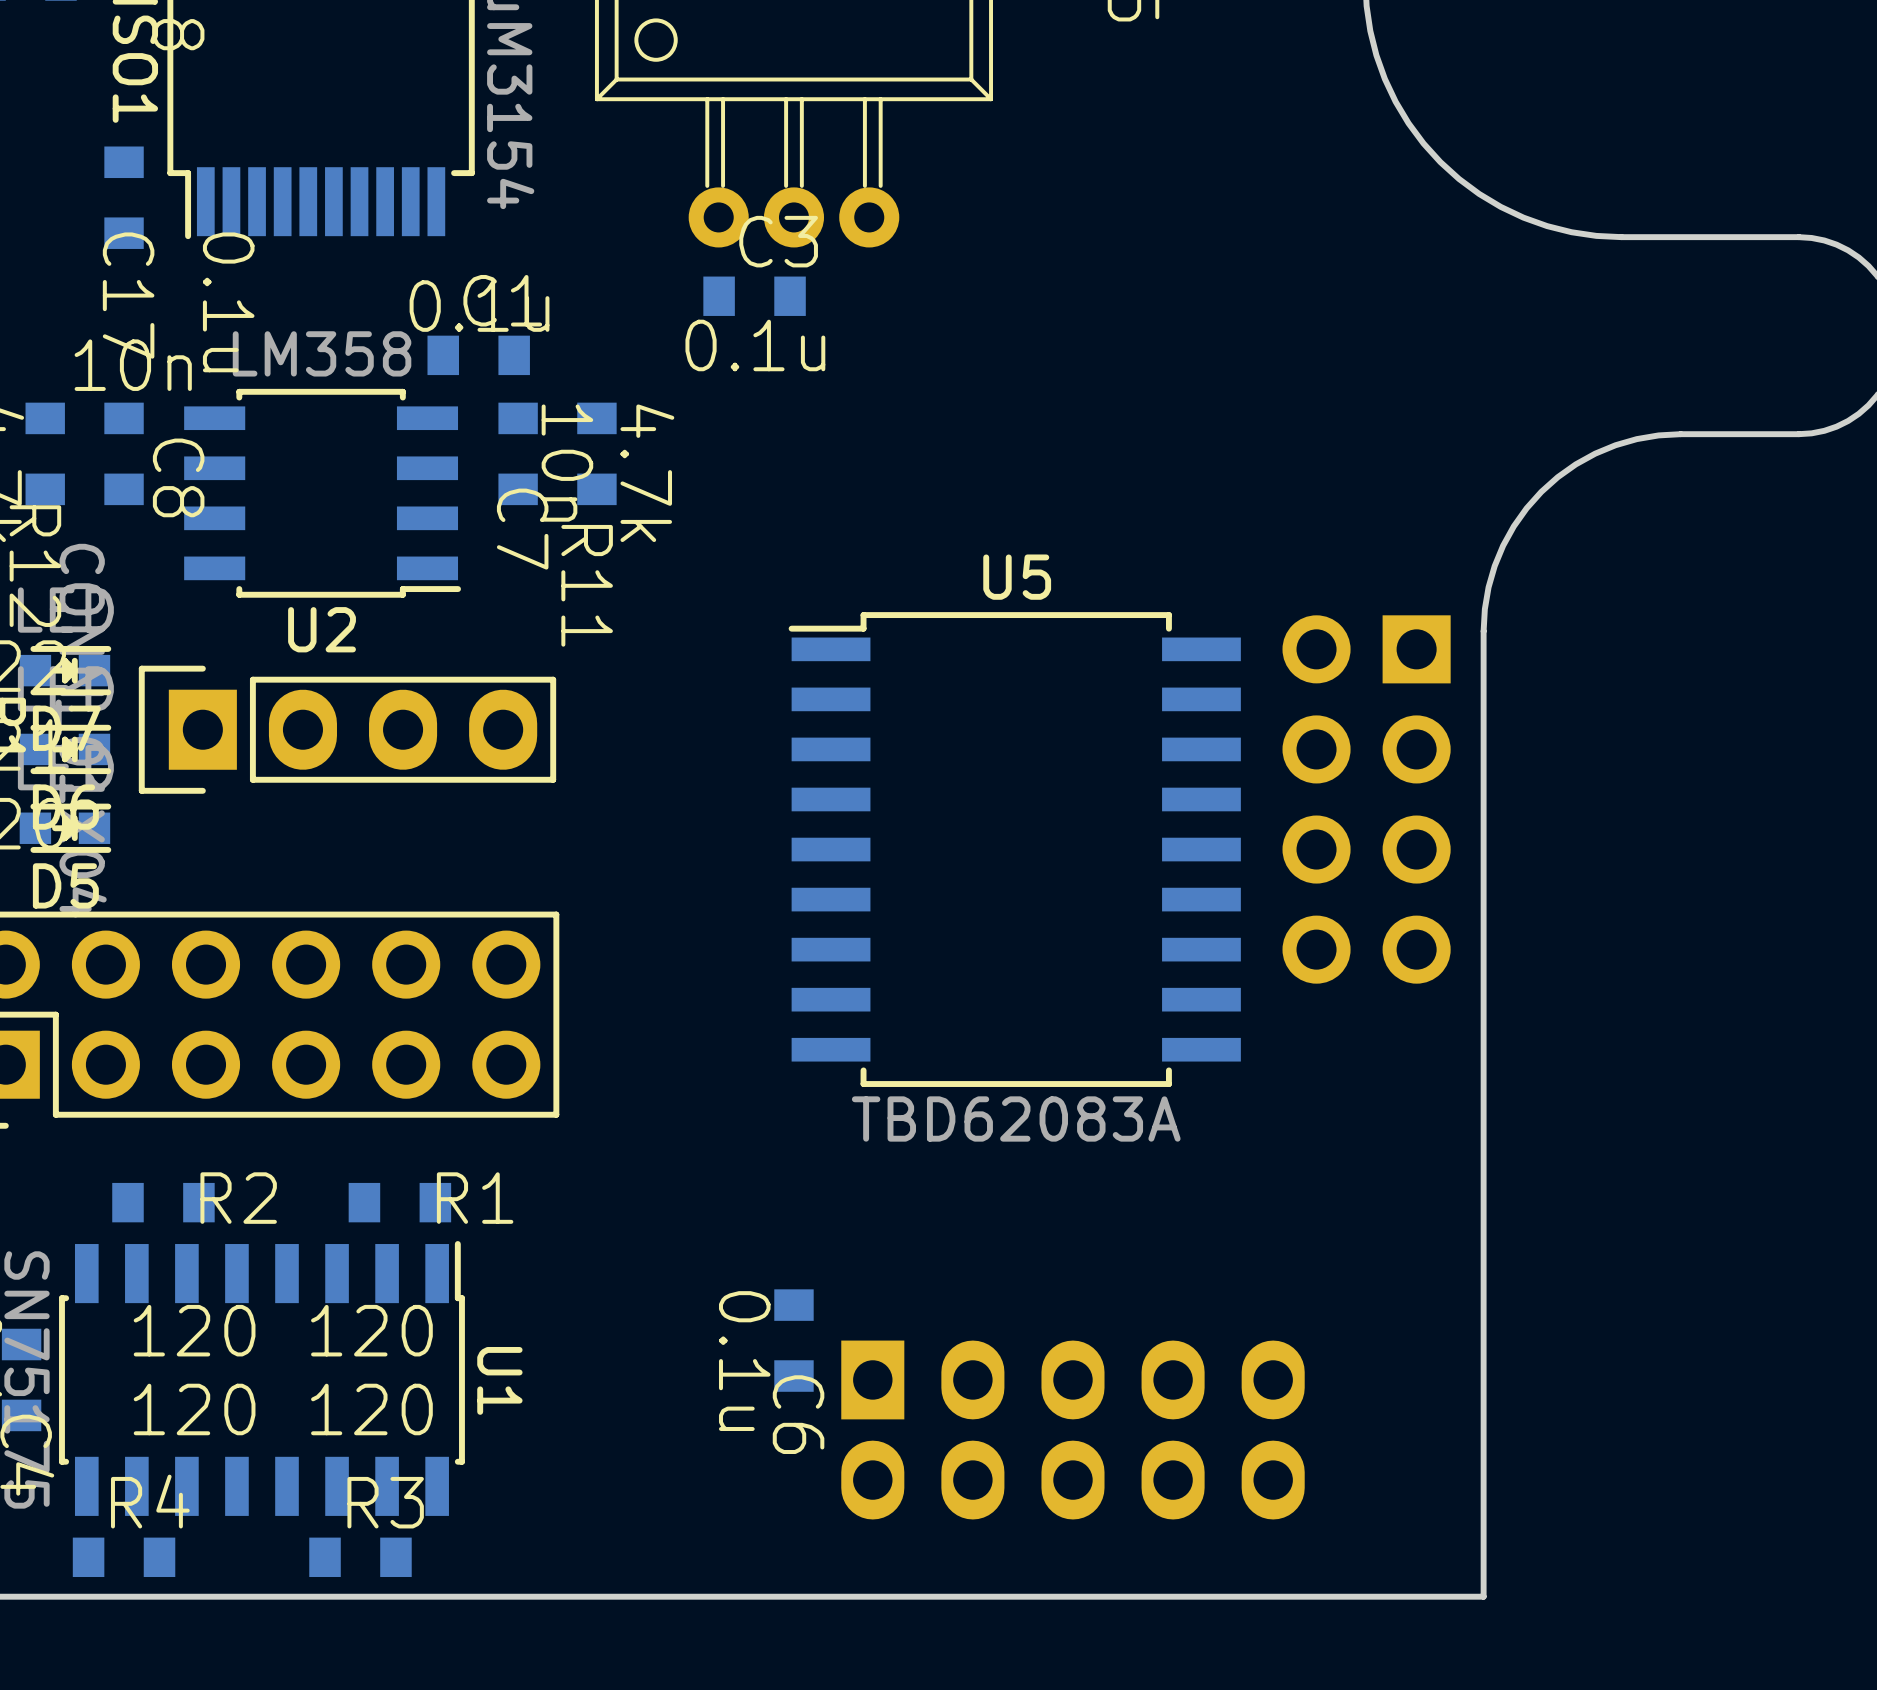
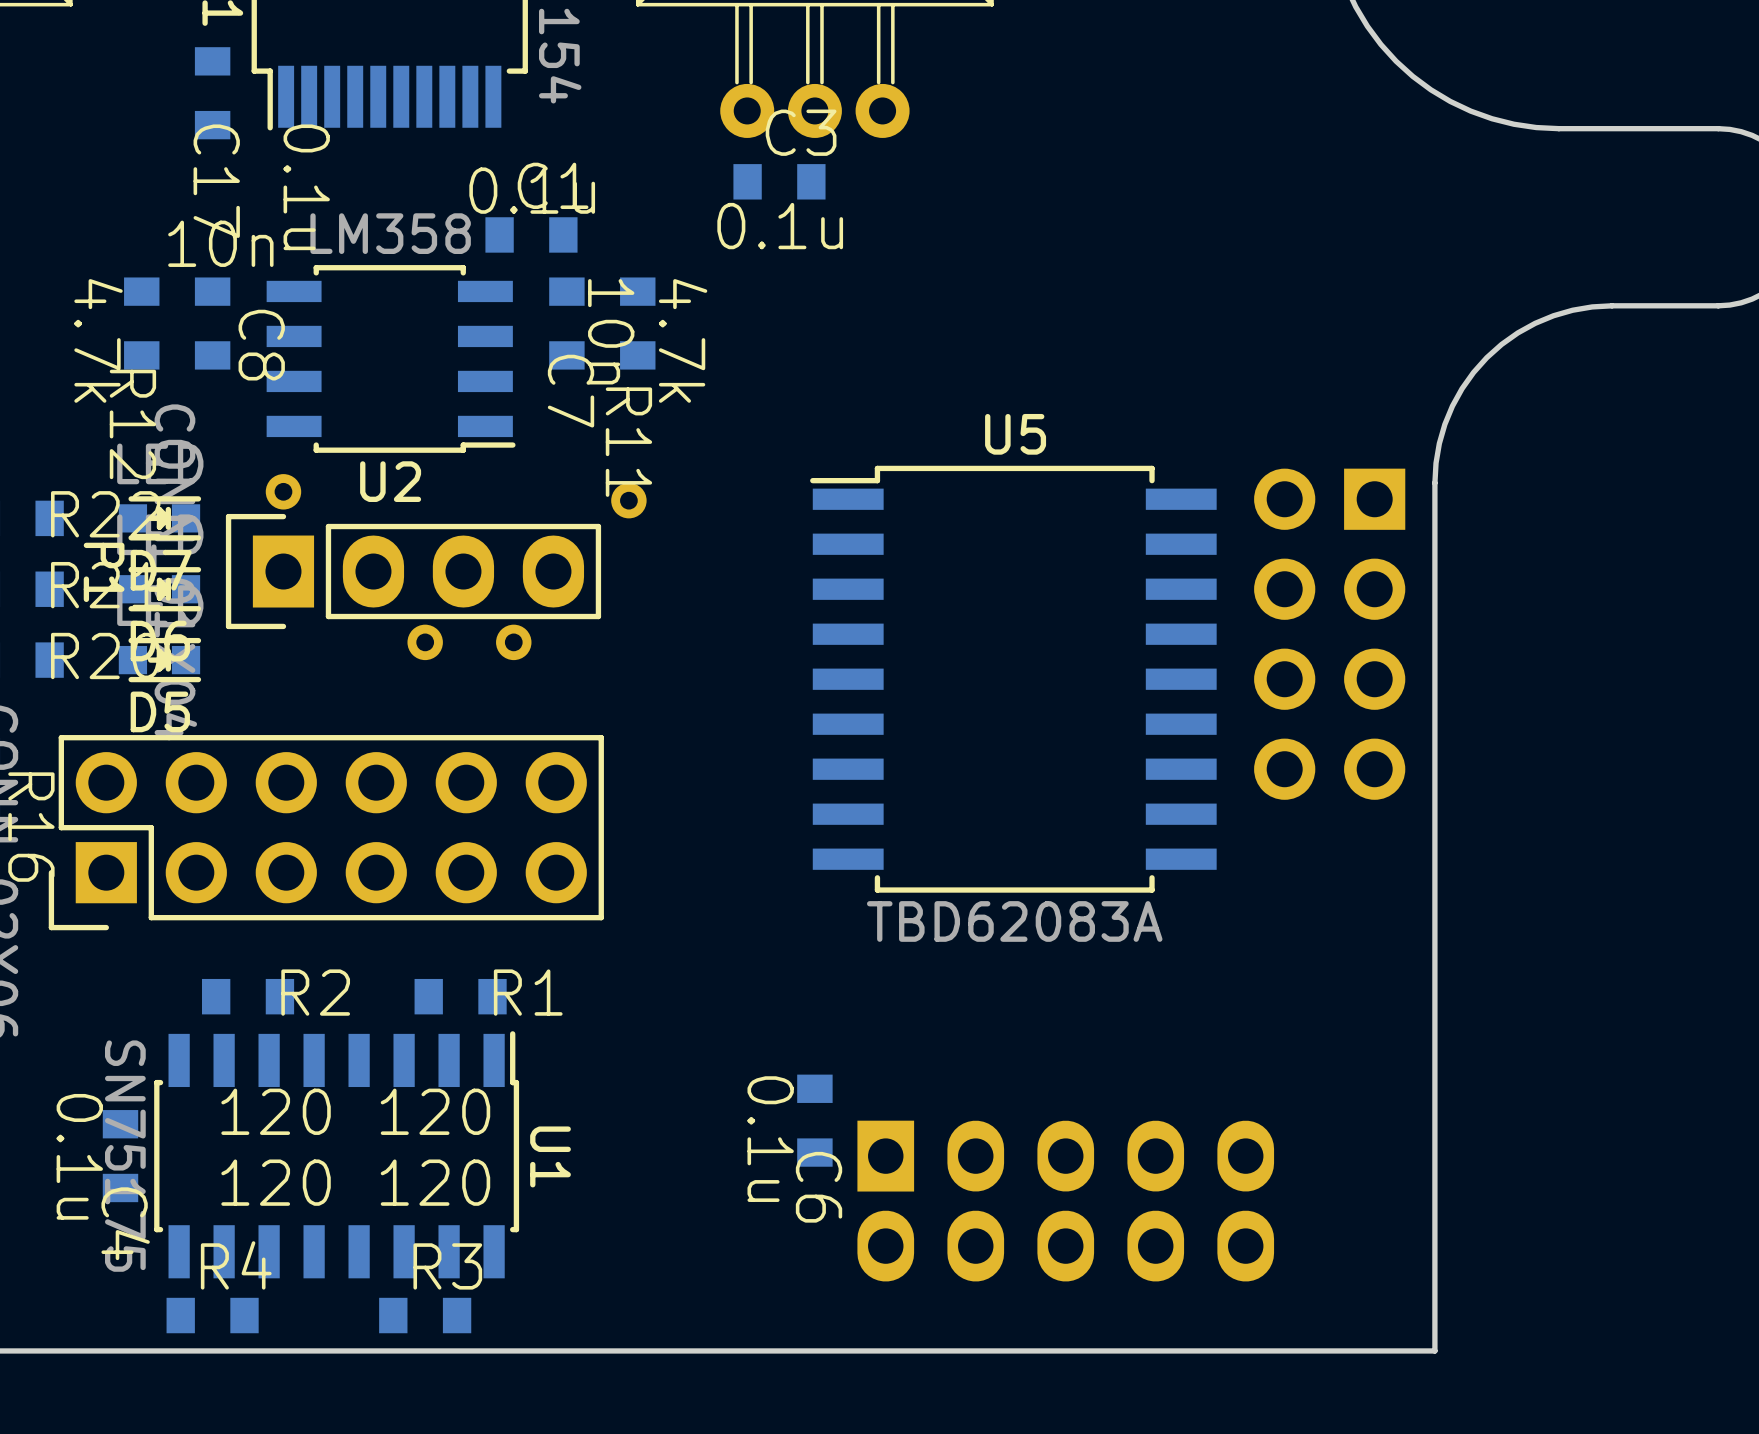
part: none -> (283, 491)
part: none -> (628, 500)
part: none -> (425, 642)
part: none -> (513, 642)

